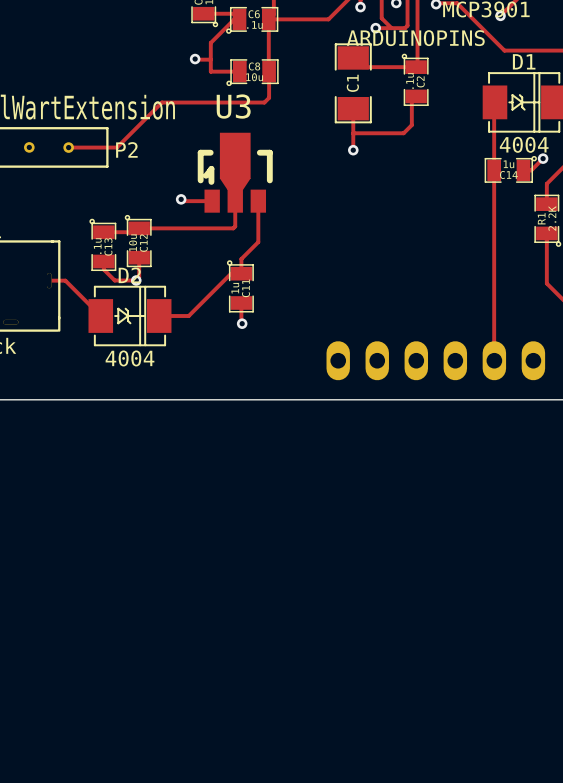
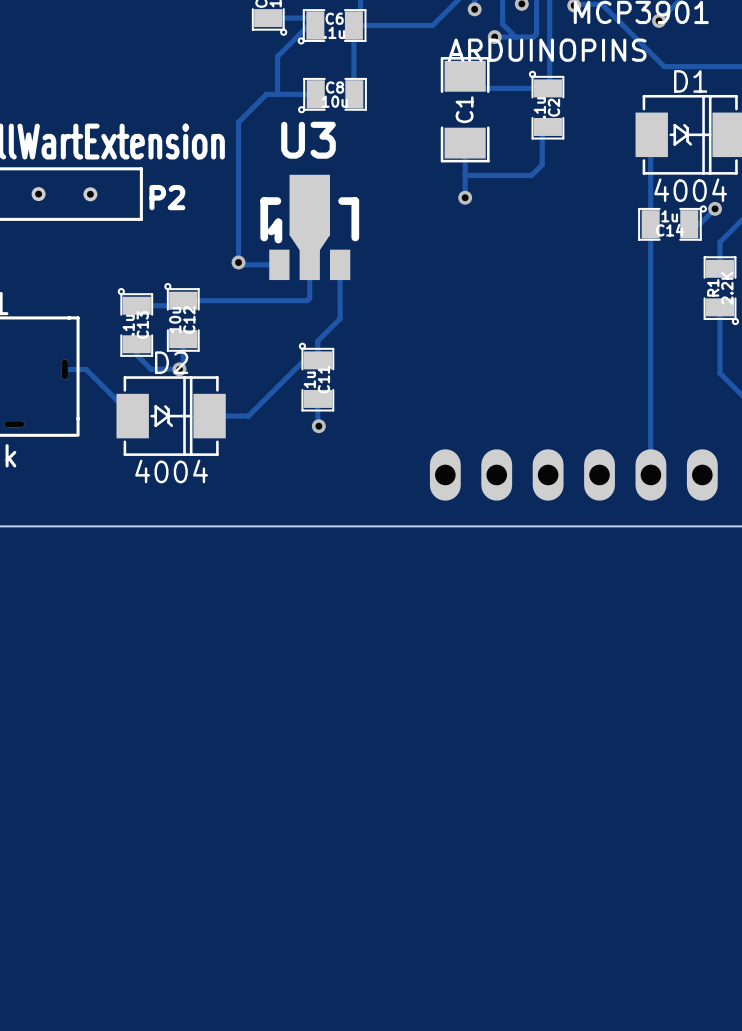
track: (195, 59) (210, 59) -> none
via: (195, 59) -> none
track: none -> (277, 94) (266, 94) (238, 122) (238, 262)
track: (269, 71) (269, 97) (264, 102) (161, 102) (116, 147) (68, 147) -> none

